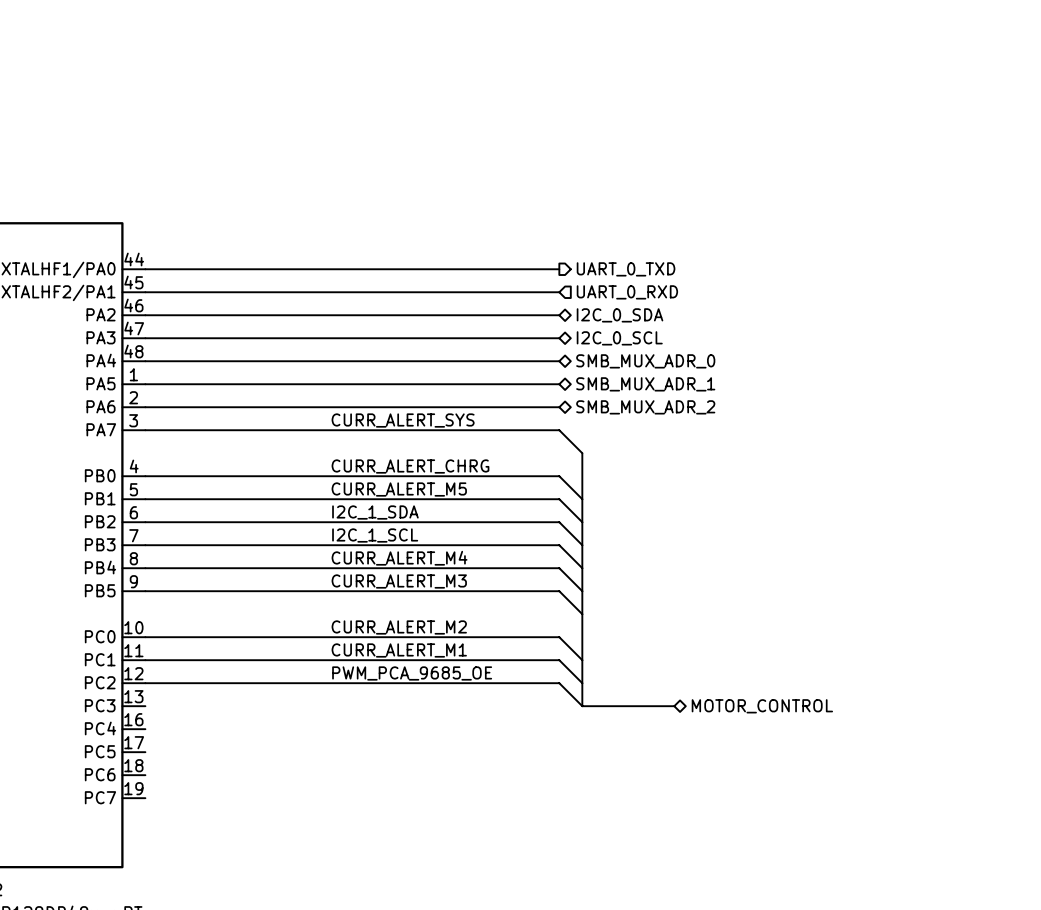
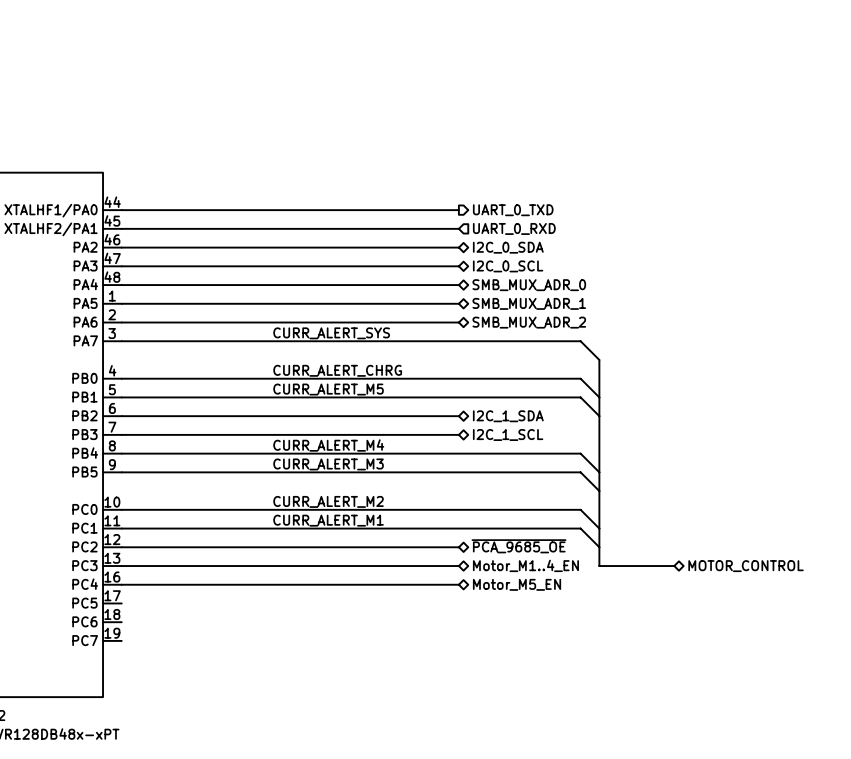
wire: (559, 430) (582, 453) -> (458, 341) (580, 341) (599, 359)
bus: (582, 453) (582, 706) (674, 706) -> (599, 359) (599, 566) (674, 566)
wire: (559, 476) (582, 499) -> (458, 378) (580, 378) (599, 397)
wire: (559, 499) (582, 522) -> (458, 397) (580, 397) (599, 416)
label: I2C_1_SDA (375, 512) -> none
wire: (559, 522) (582, 545) -> none
hierarchical label: none -> I2C_1_SDA (508, 416)
label: I2C_1_SCL (375, 535) -> none
wire: (559, 545) (582, 568) -> none
hierarchical label: none -> I2C_1_SCL (508, 434)
wire: (559, 568) (582, 591) -> (458, 453) (580, 453) (599, 472)
wire: (559, 591) (582, 614) -> (458, 472) (580, 472) (599, 491)
wire: (559, 637) (582, 660) -> (458, 509) (580, 509) (599, 528)
wire: (559, 660) (582, 683) -> (458, 528) (580, 528) (599, 547)
label: PWM_PCA_9685_OE (412, 673) -> none
hierarchical label: none -> ~{PCA_9685_OE} (519, 546)
wire: (559, 683) (582, 706) -> none
wire: none -> (121, 566) (458, 566)
hierarchical label: none -> Motor_M1..4_EN (525, 565)
hierarchical label position: MOTOR_CONTROL (762, 706) -> MOTOR_CONTROL (746, 566)
wire: none -> (121, 584) (458, 584)
hierarchical label: none -> Motor_M5_EN (517, 584)

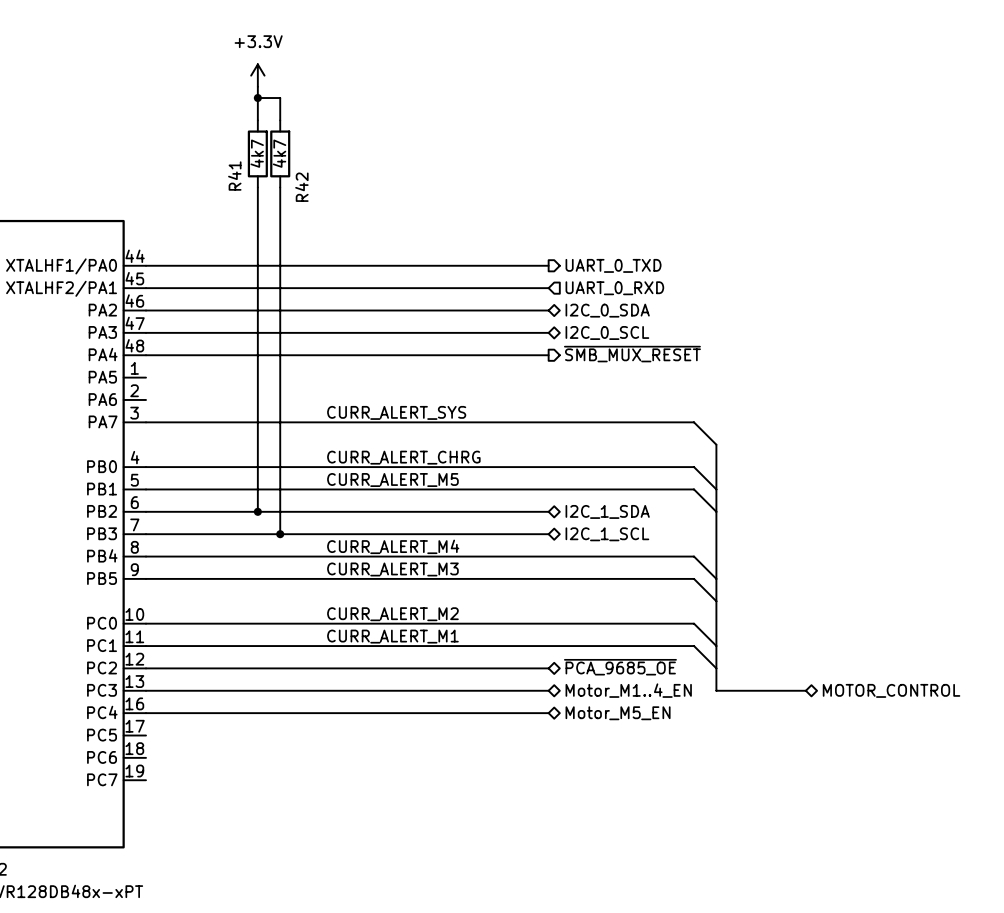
power symbol: none -> +3.3V (257, 75)
wire: none -> (257, 86) (257, 120)
wire: none -> (257, 98) (280, 98) (280, 120)
junction: none -> (257, 98)
R41: none -> 4k7 (257, 153)
R42: none -> 4k7 (280, 153)
wire: none -> (257, 187) (257, 511)
wire: none -> (280, 187) (280, 534)
hierarchical label shape: bidirectional (529, 285) -> output (632, 354)
hierarchical label: SMB_MUX_ADR_0 (529, 285) -> ~{SMB_MUX_RESET} (632, 354)
wire: (121, 303) (458, 303) -> none
hierarchical label: SMB_MUX_ADR_1 (529, 303) -> none
wire: (121, 322) (458, 322) -> none
hierarchical label: SMB_MUX_ADR_2 (529, 322) -> none
junction: none -> (257, 511)
junction: none -> (280, 534)

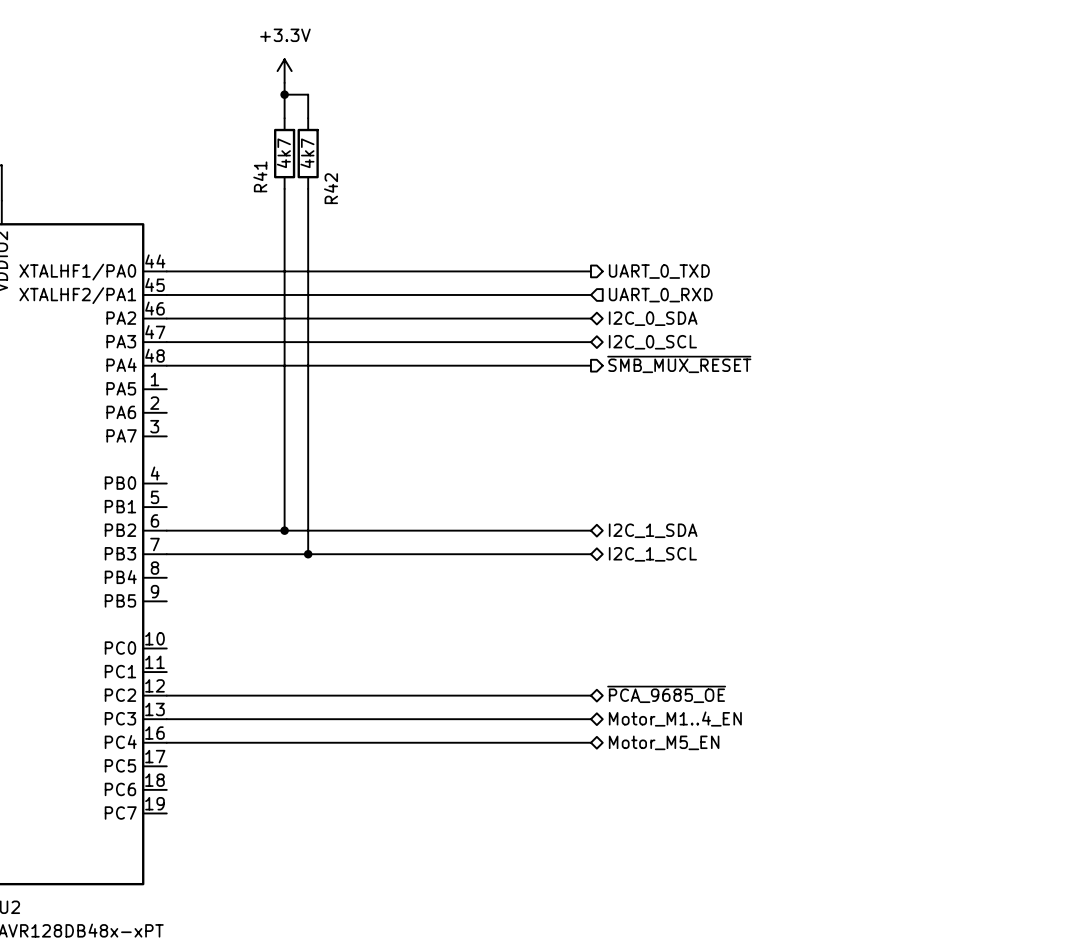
label: CURR_ALERT_SYS (396, 412) -> none
wire: (146, 422) (694, 422) (716, 444) -> none
bus: (716, 444) (716, 690) (805, 690) -> none
label: CURR_ALERT_CHRG (403, 457) -> none
wire: (146, 467) (694, 467) (716, 489) -> none
label: CURR_ALERT_M5 (392, 480) -> none
wire: (146, 489) (694, 489) (716, 511) -> none
label: CURR_ALERT_M4 (393, 546) -> none
wire: (146, 556) (694, 556) (716, 578) -> none
label: CURR_ALERT_M3 (392, 569) -> none
wire: (146, 578) (694, 578) (716, 601) -> none
label: CURR_ALERT_M2 (392, 614) -> none
wire: (146, 623) (694, 623) (716, 646) -> none
label: CURR_ALERT_M1 (392, 636) -> none
wire: (146, 646) (694, 646) (716, 668) -> none
hierarchical label: MOTOR_CONTROL (891, 690) -> none

